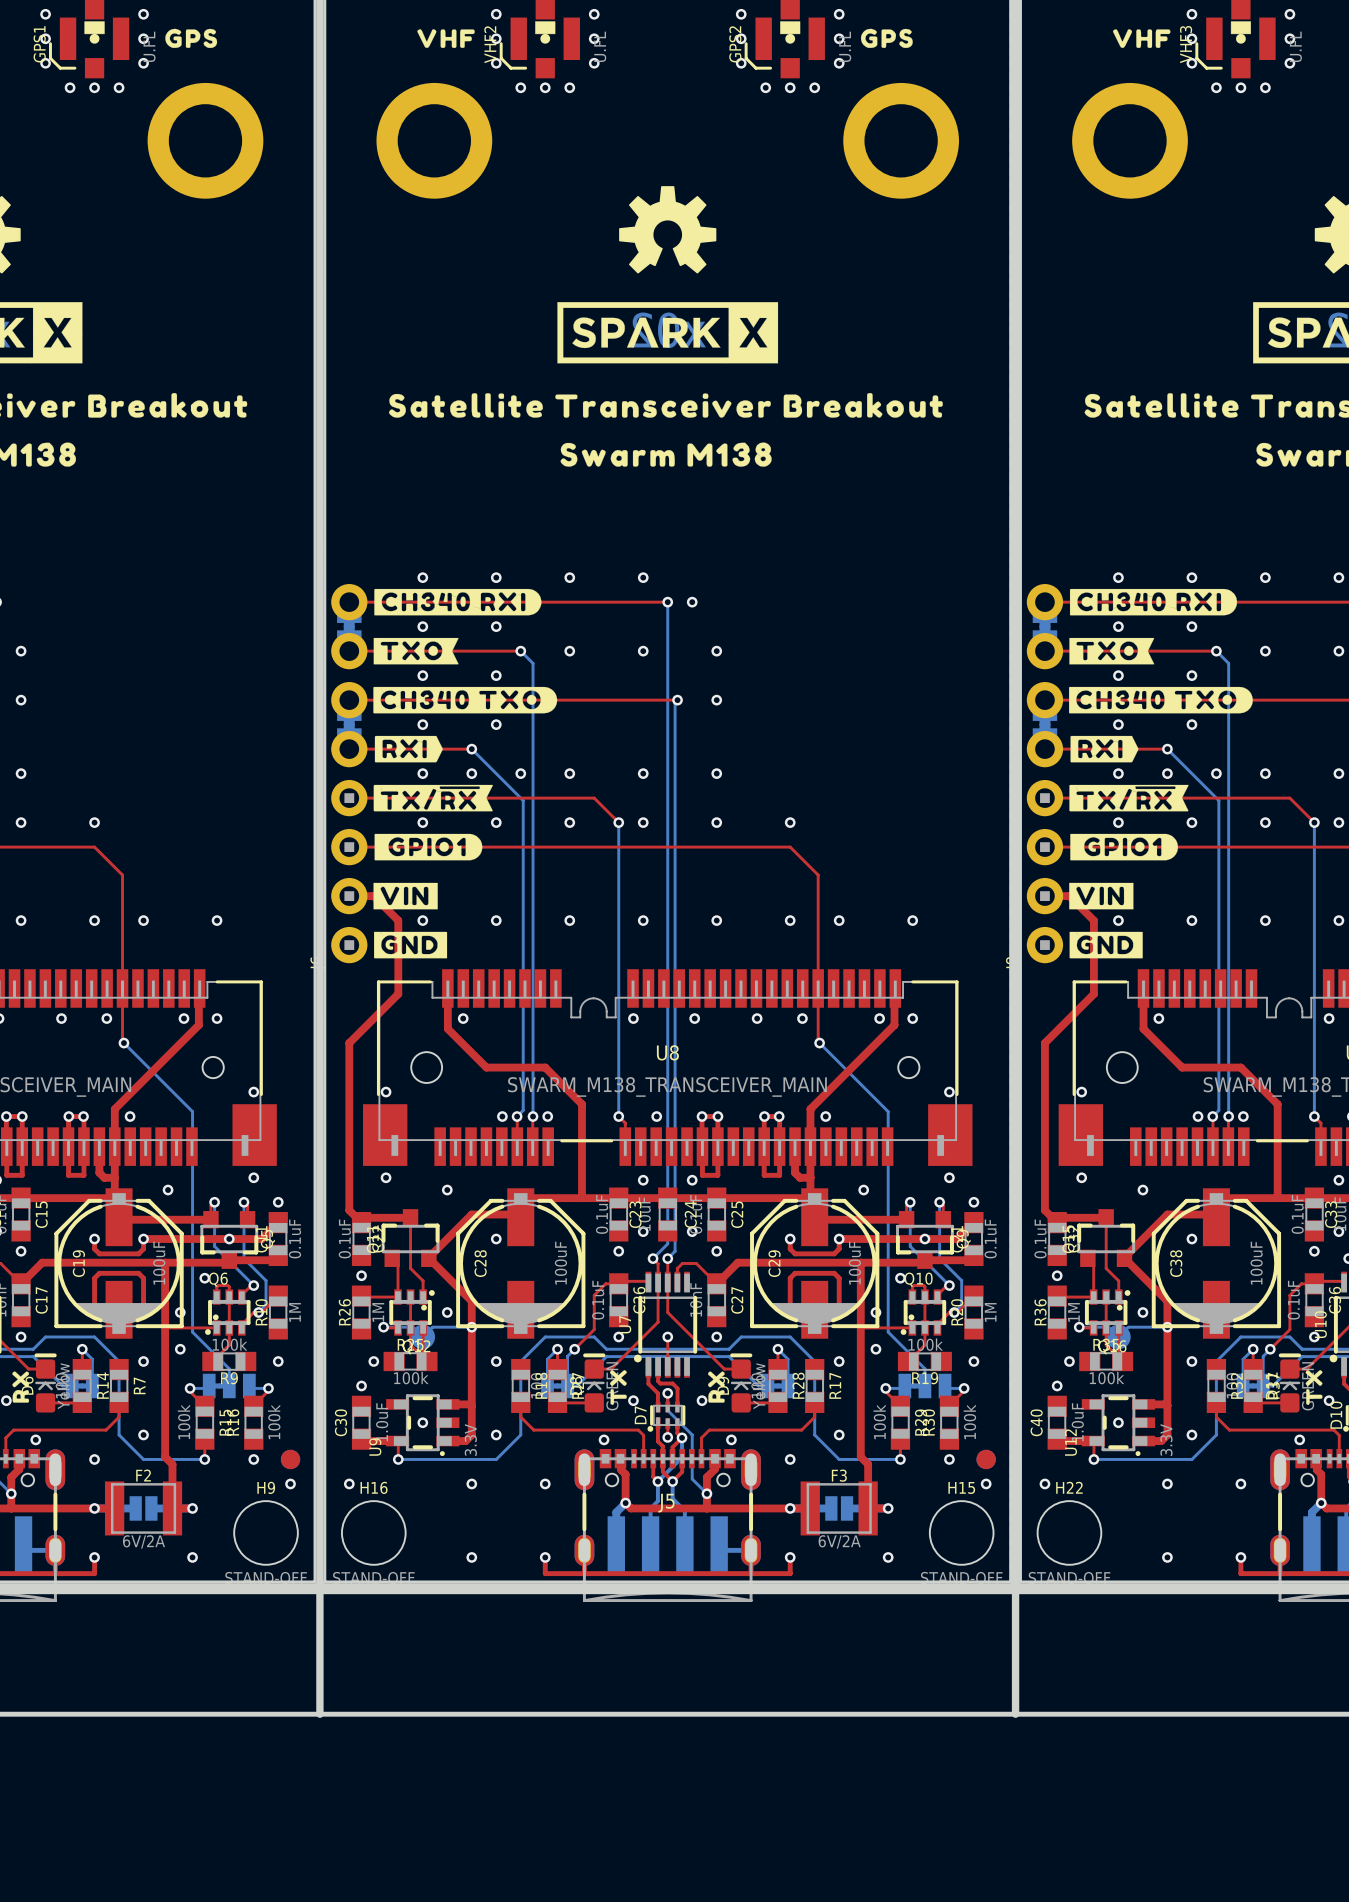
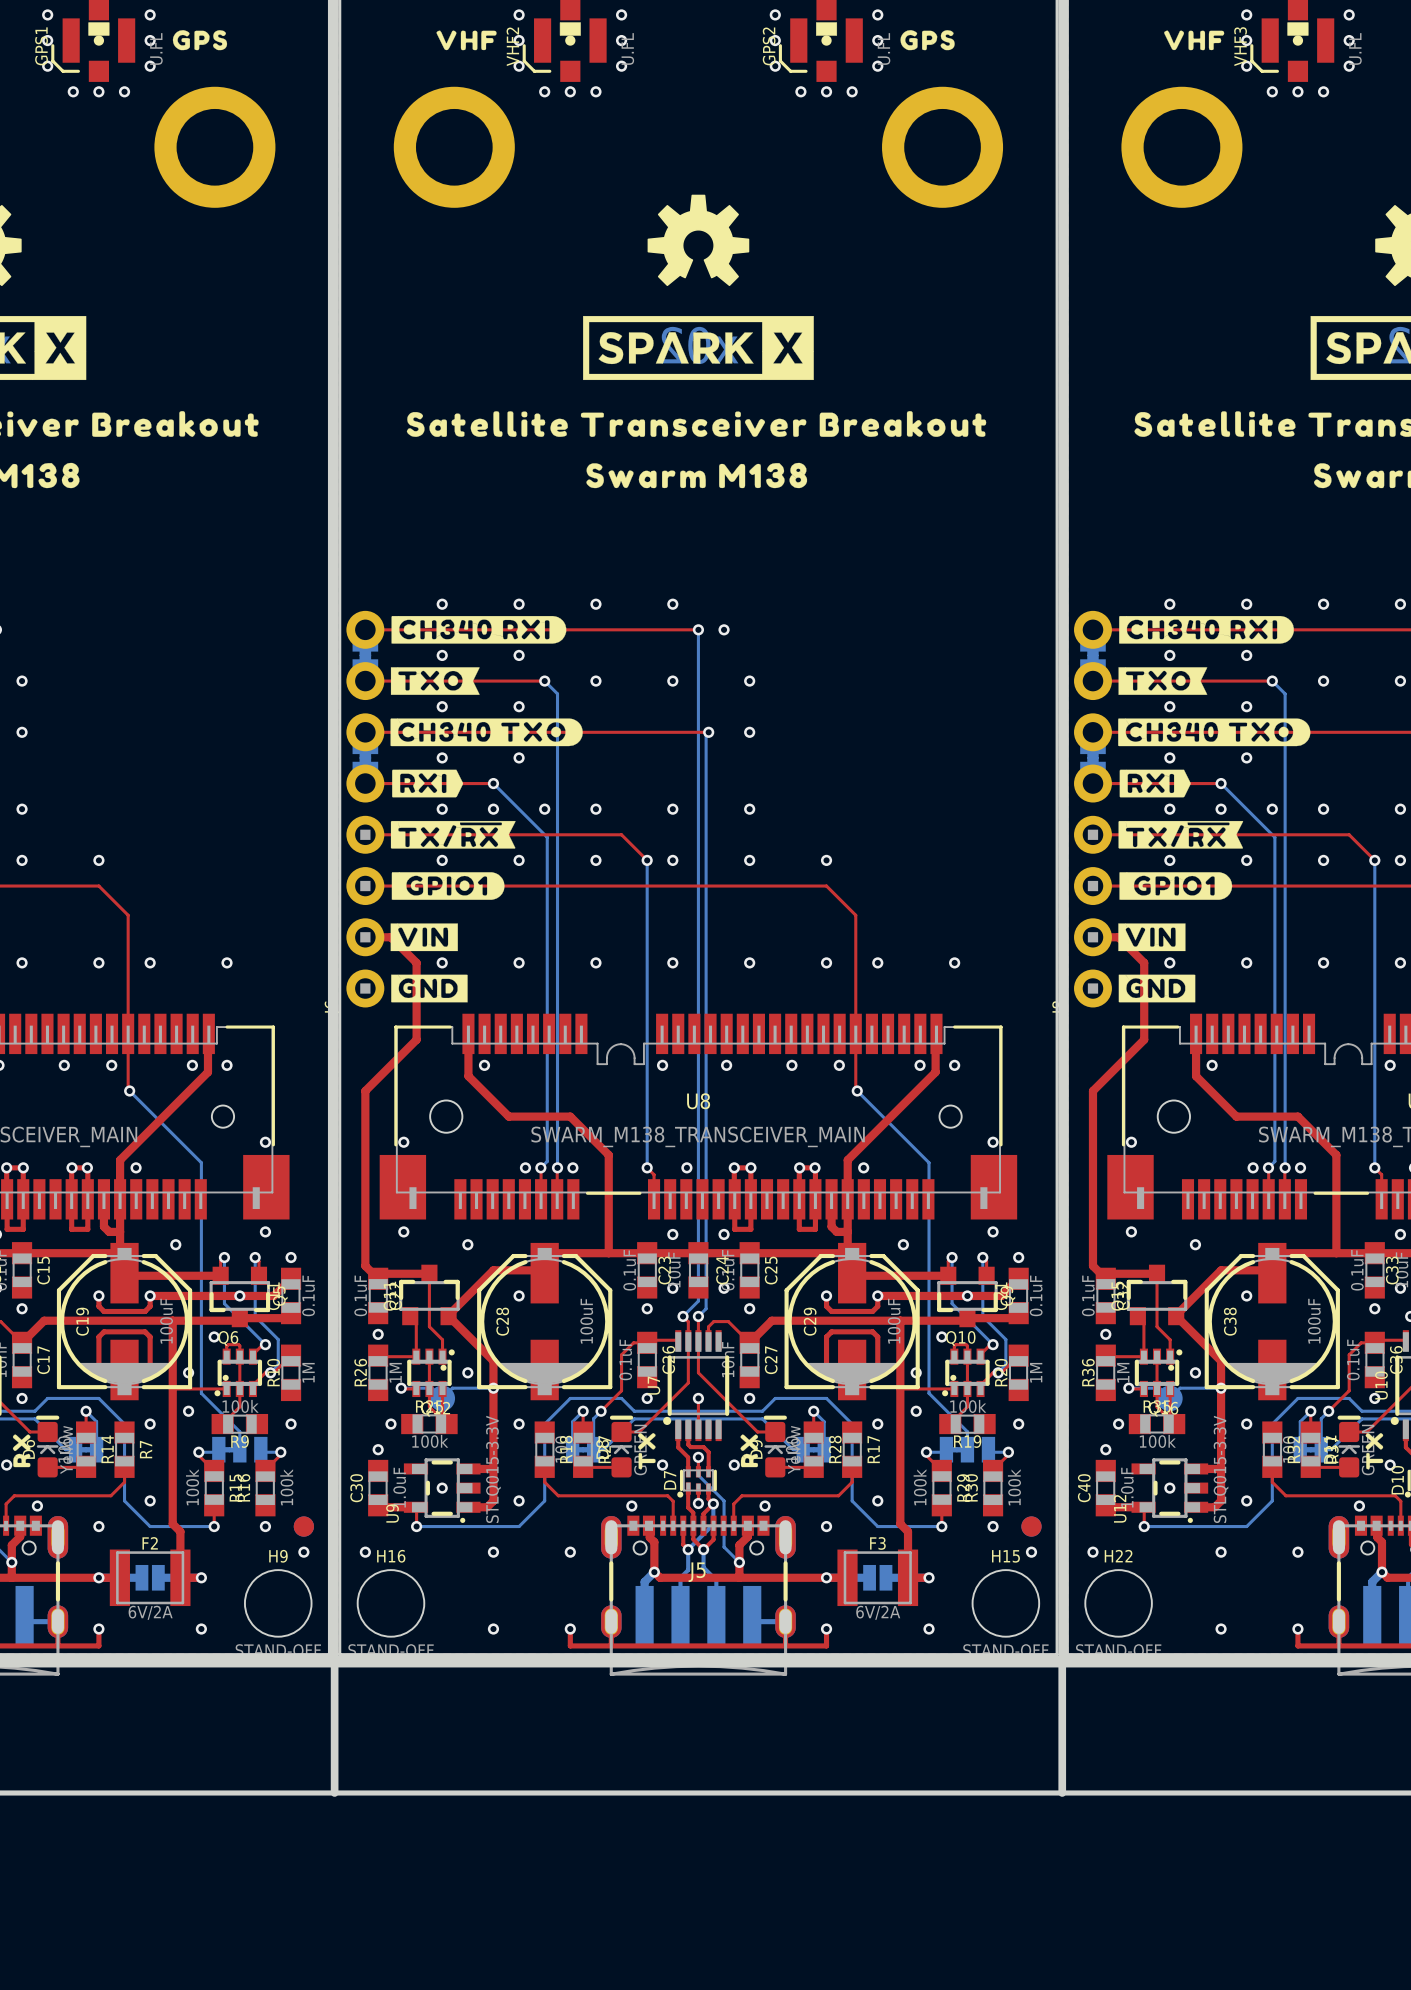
U9 value: 3.3V (470, 1440) -> STLQ015-3.3V (493, 1469)
U12 value: 3.3V (1166, 1440) -> STLQ015-3.3V (1221, 1469)

